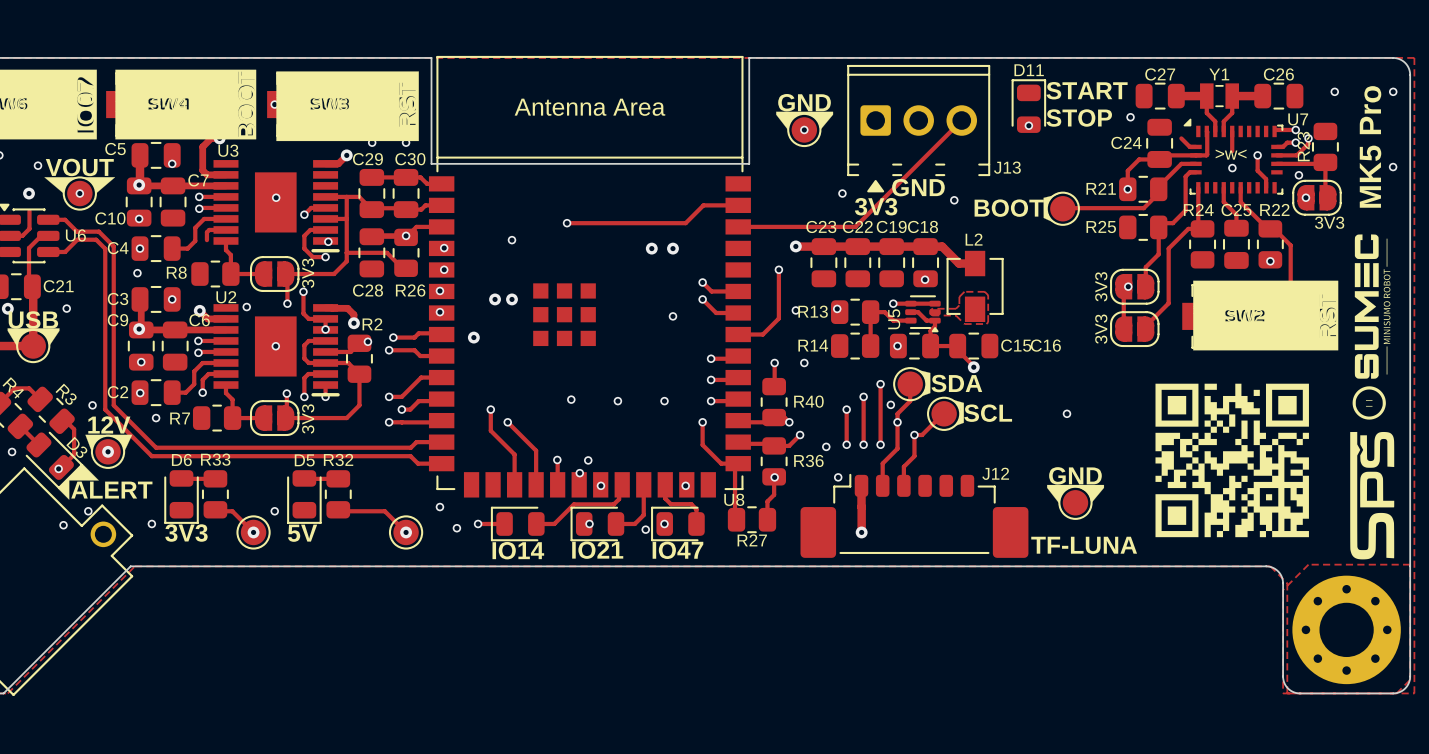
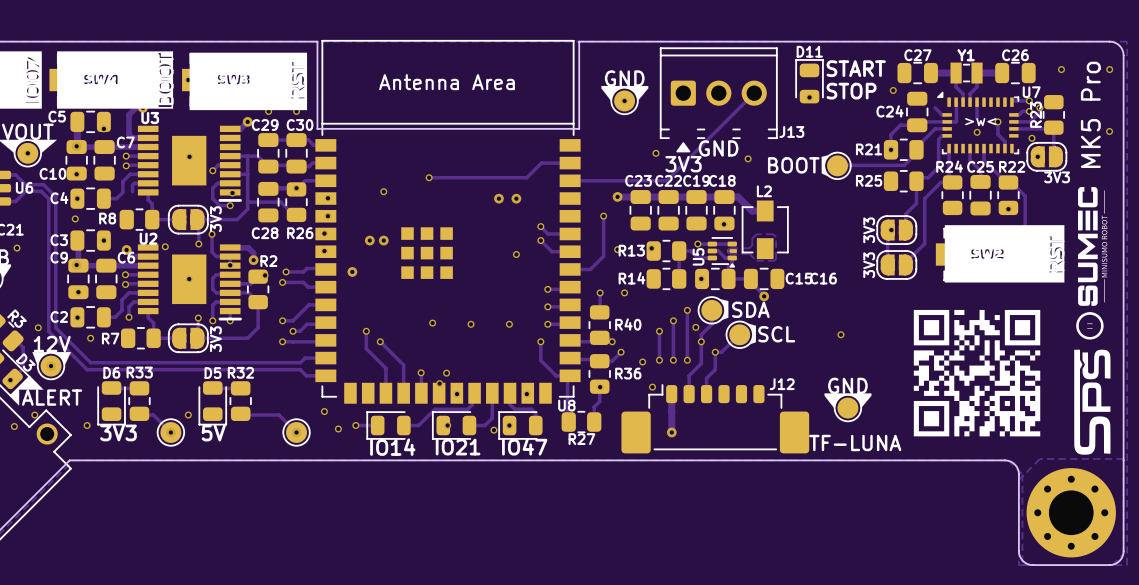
drawing: none -> [28, 86, 37, 96]
drawing: none -> [160, 98, 165, 105]

